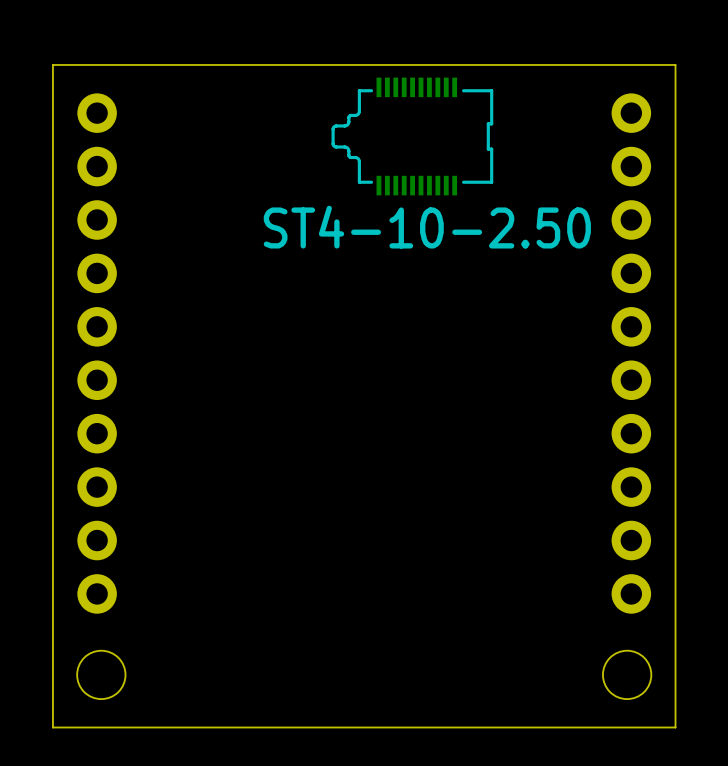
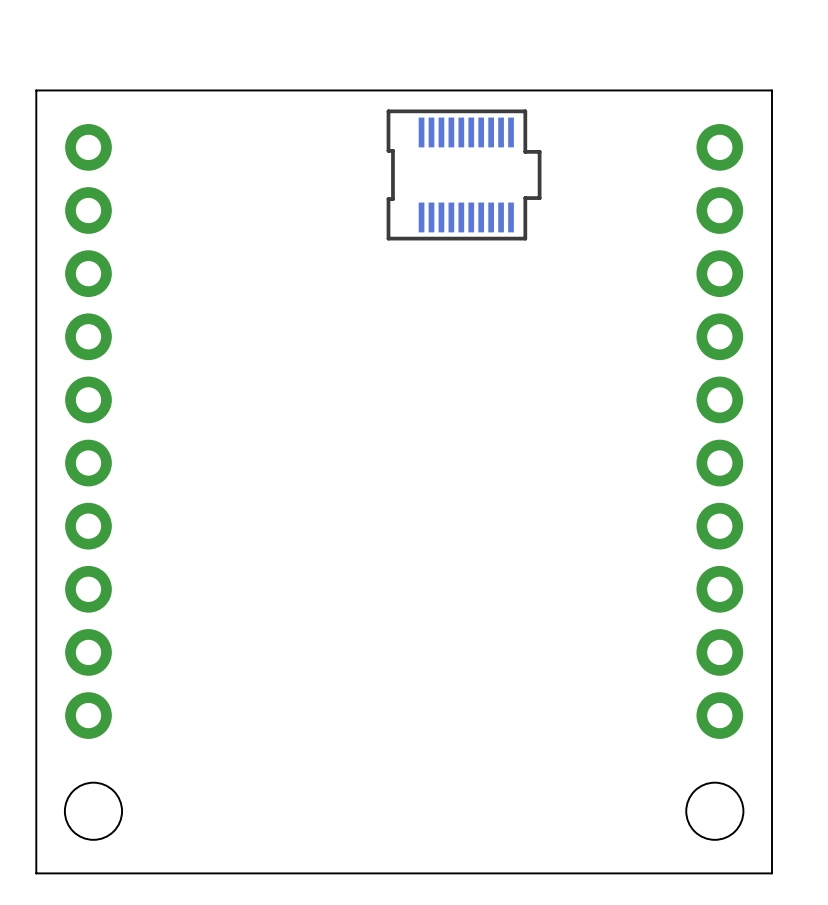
part footprint: [331, 77, 494, 196] -> [386, 109, 542, 241]
text: ST4-10-2.50 (427, 227) -> none

